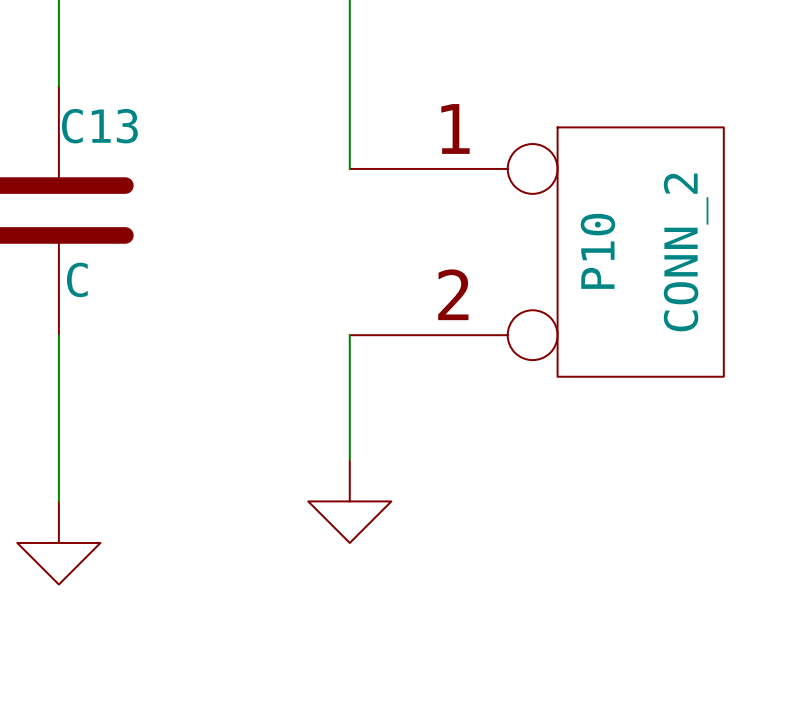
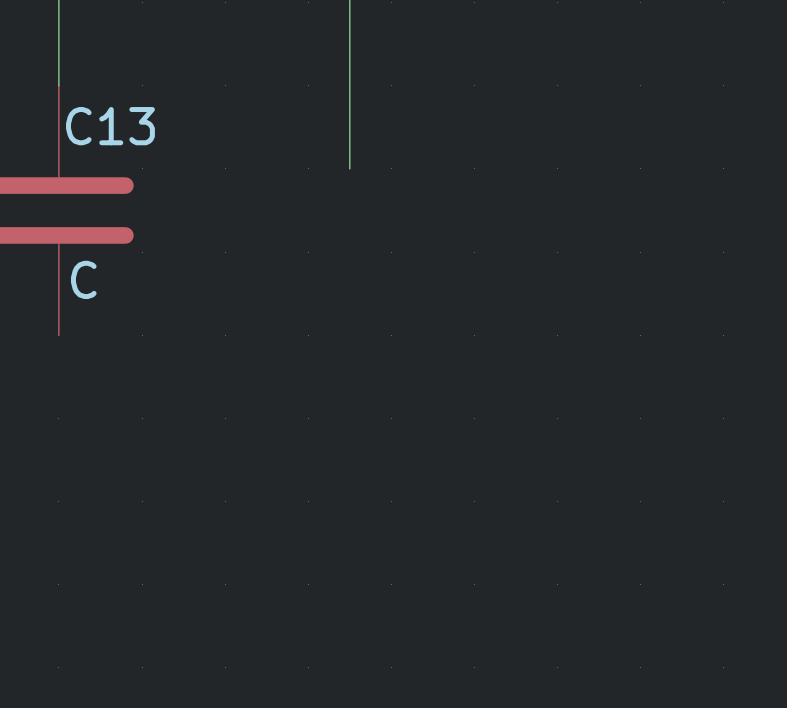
P10: CONN_2 (536, 252) -> none
wire: (58, 335) (58, 501) -> none
wire: (349, 335) (349, 459) -> none
power symbol: (349, 501) -> none
power symbol: (58, 542) -> none

